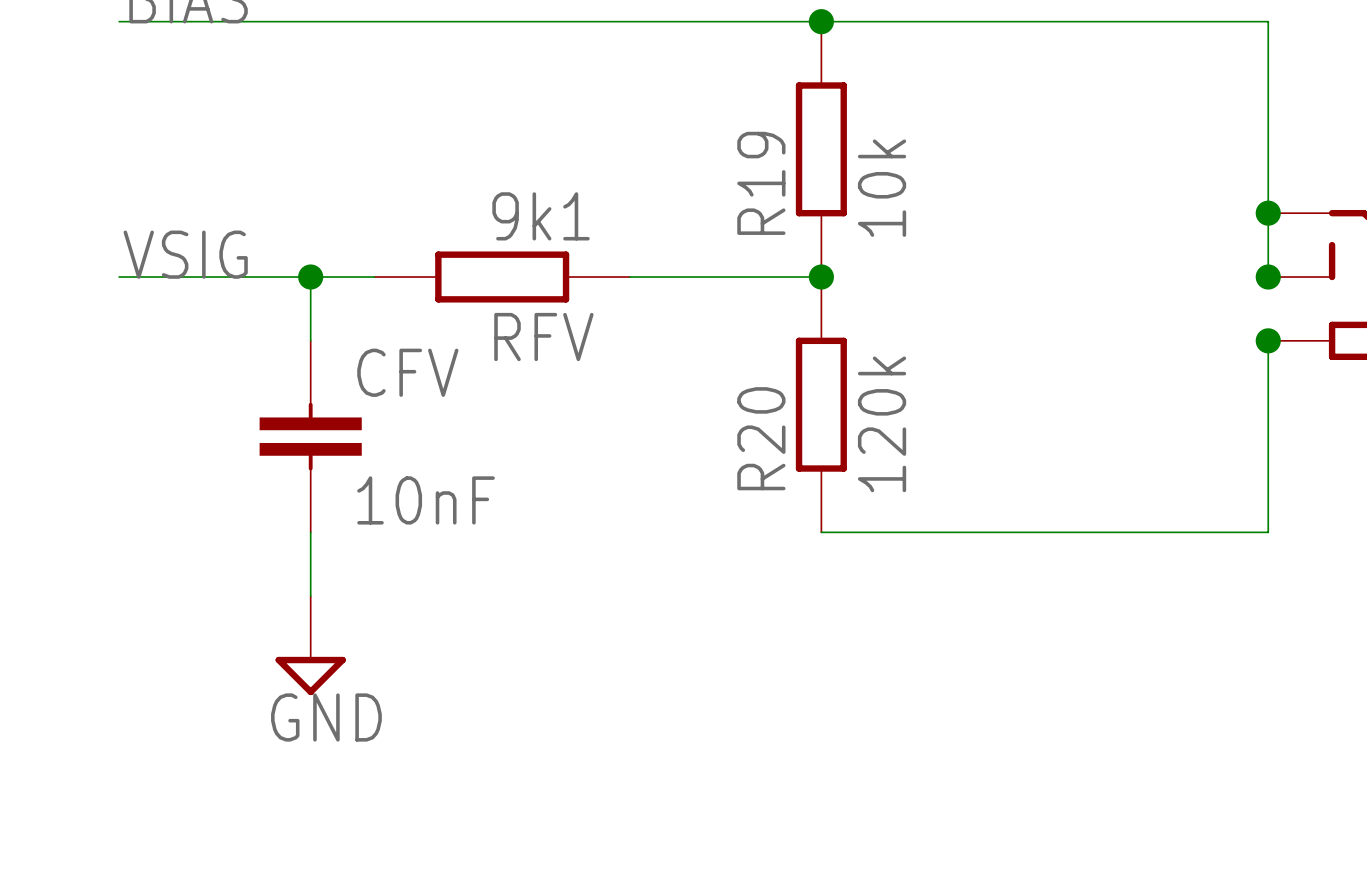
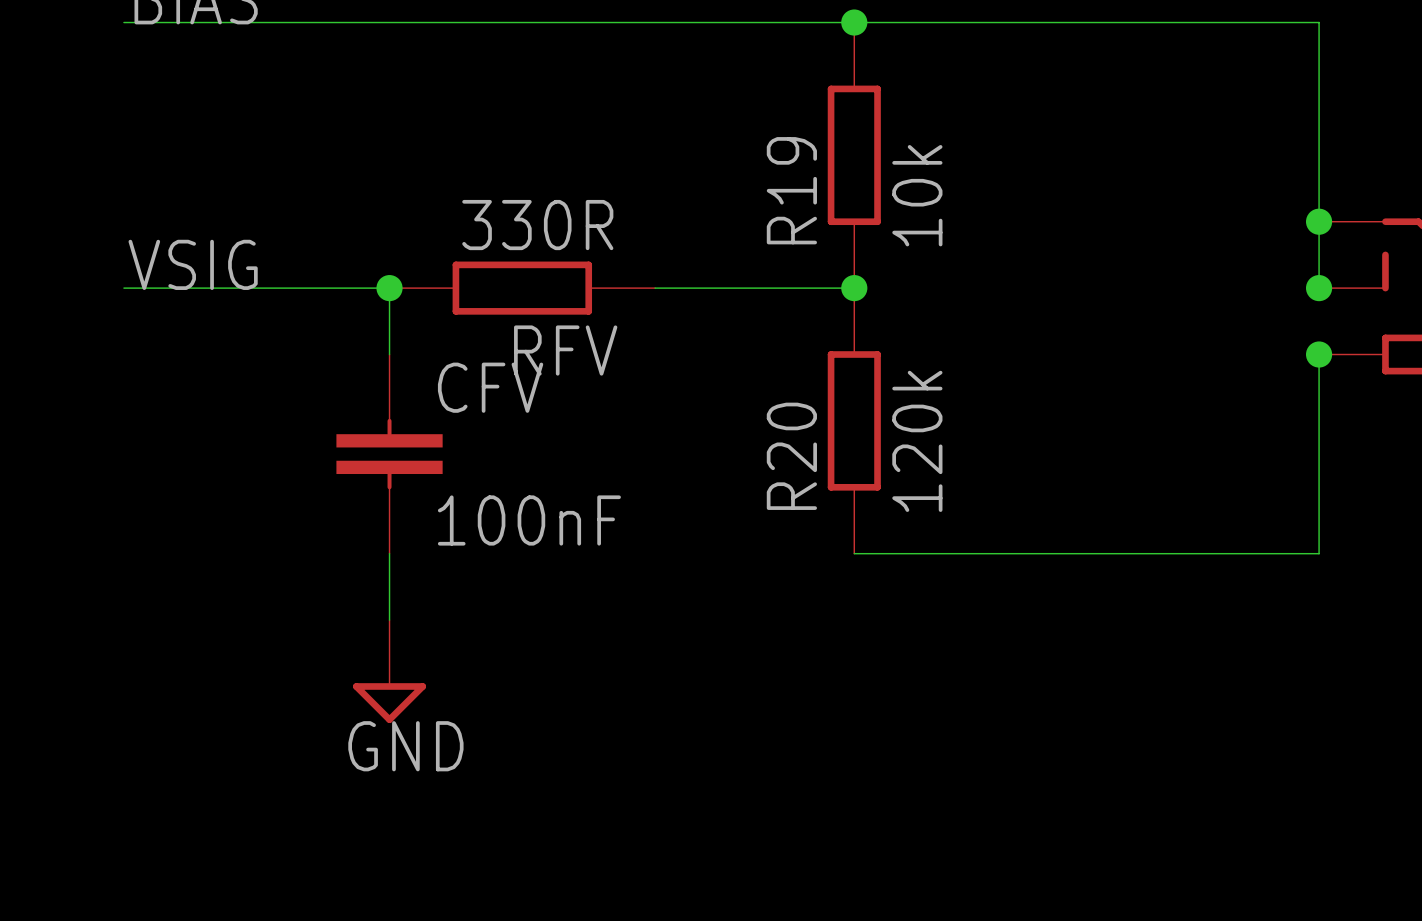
RFV value: 9k1 (541, 216) -> 330R (537, 225)
wire: (310, 277) (310, 340) -> (389, 288) (389, 354)
junction position: (310, 277) -> (389, 288)
CFV: 10nF (310, 436) -> none
CFV: none -> 100nF (389, 454)
wire: (310, 532) (310, 596) -> (389, 553) (389, 620)
power symbol position: GND (310, 645) -> GND (389, 671)

